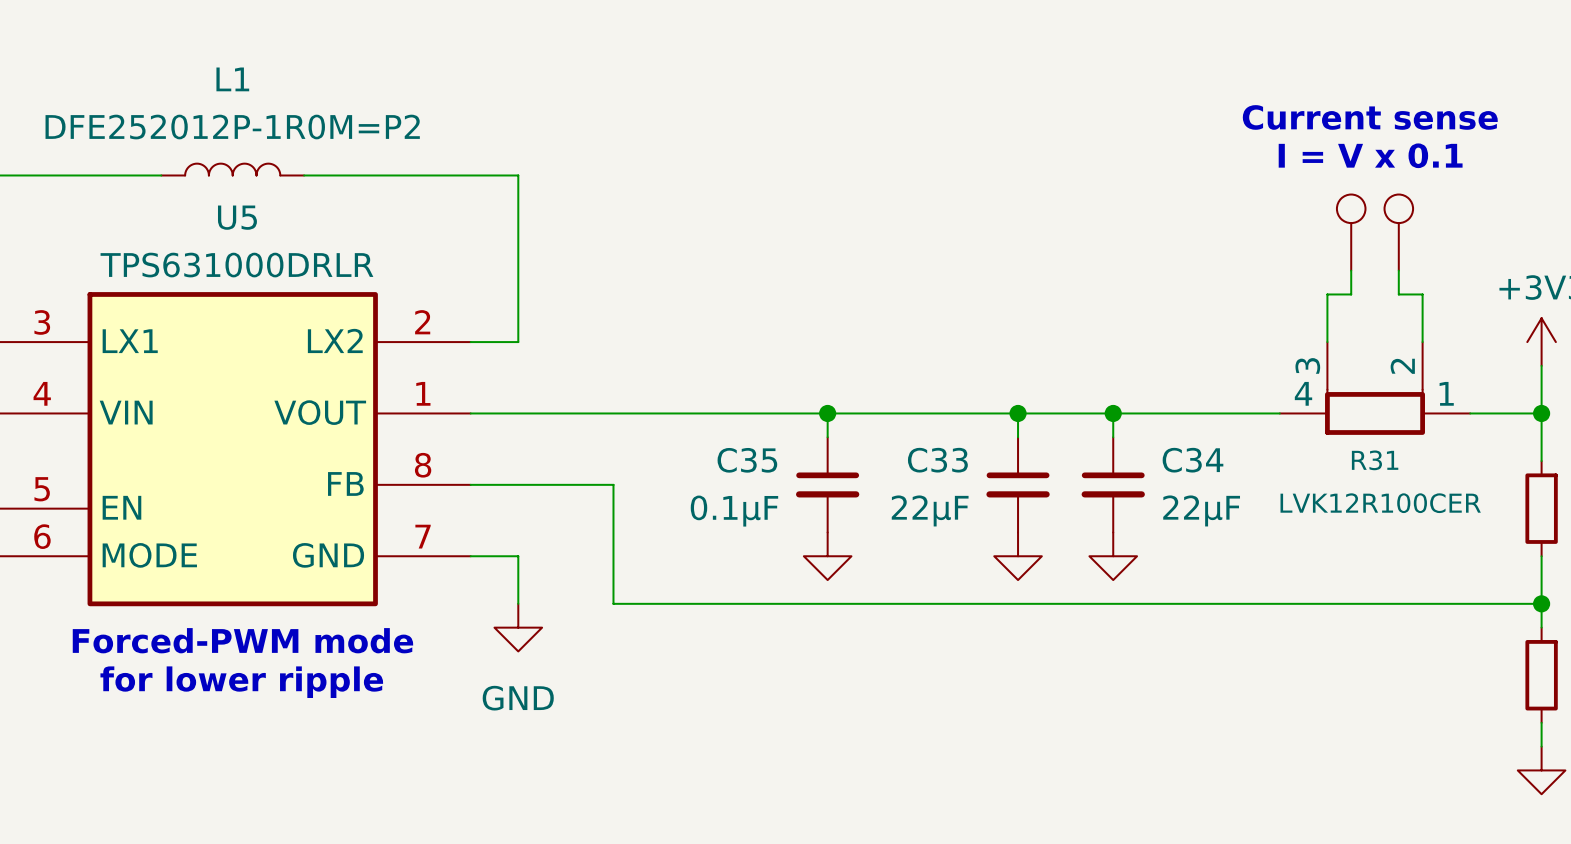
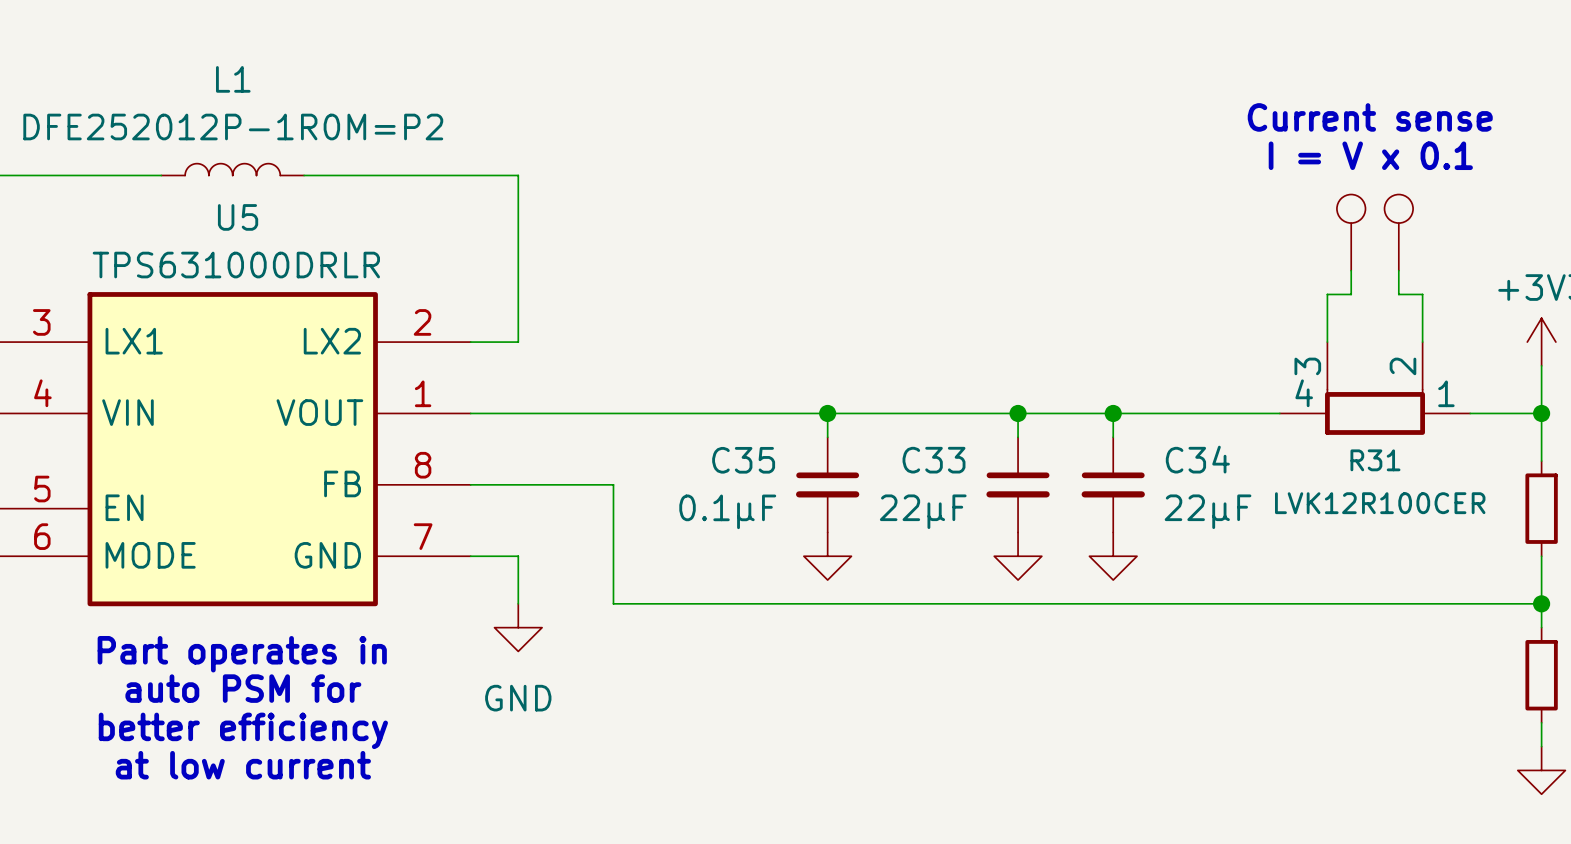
text: Forced-PWM mode (242, 640) -> Part operates in (242, 654)
text: for lower ripple (241, 682) -> auto PSM for (243, 688)
text: none -> better efficiency (243, 730)
text: none -> at low current (243, 765)

